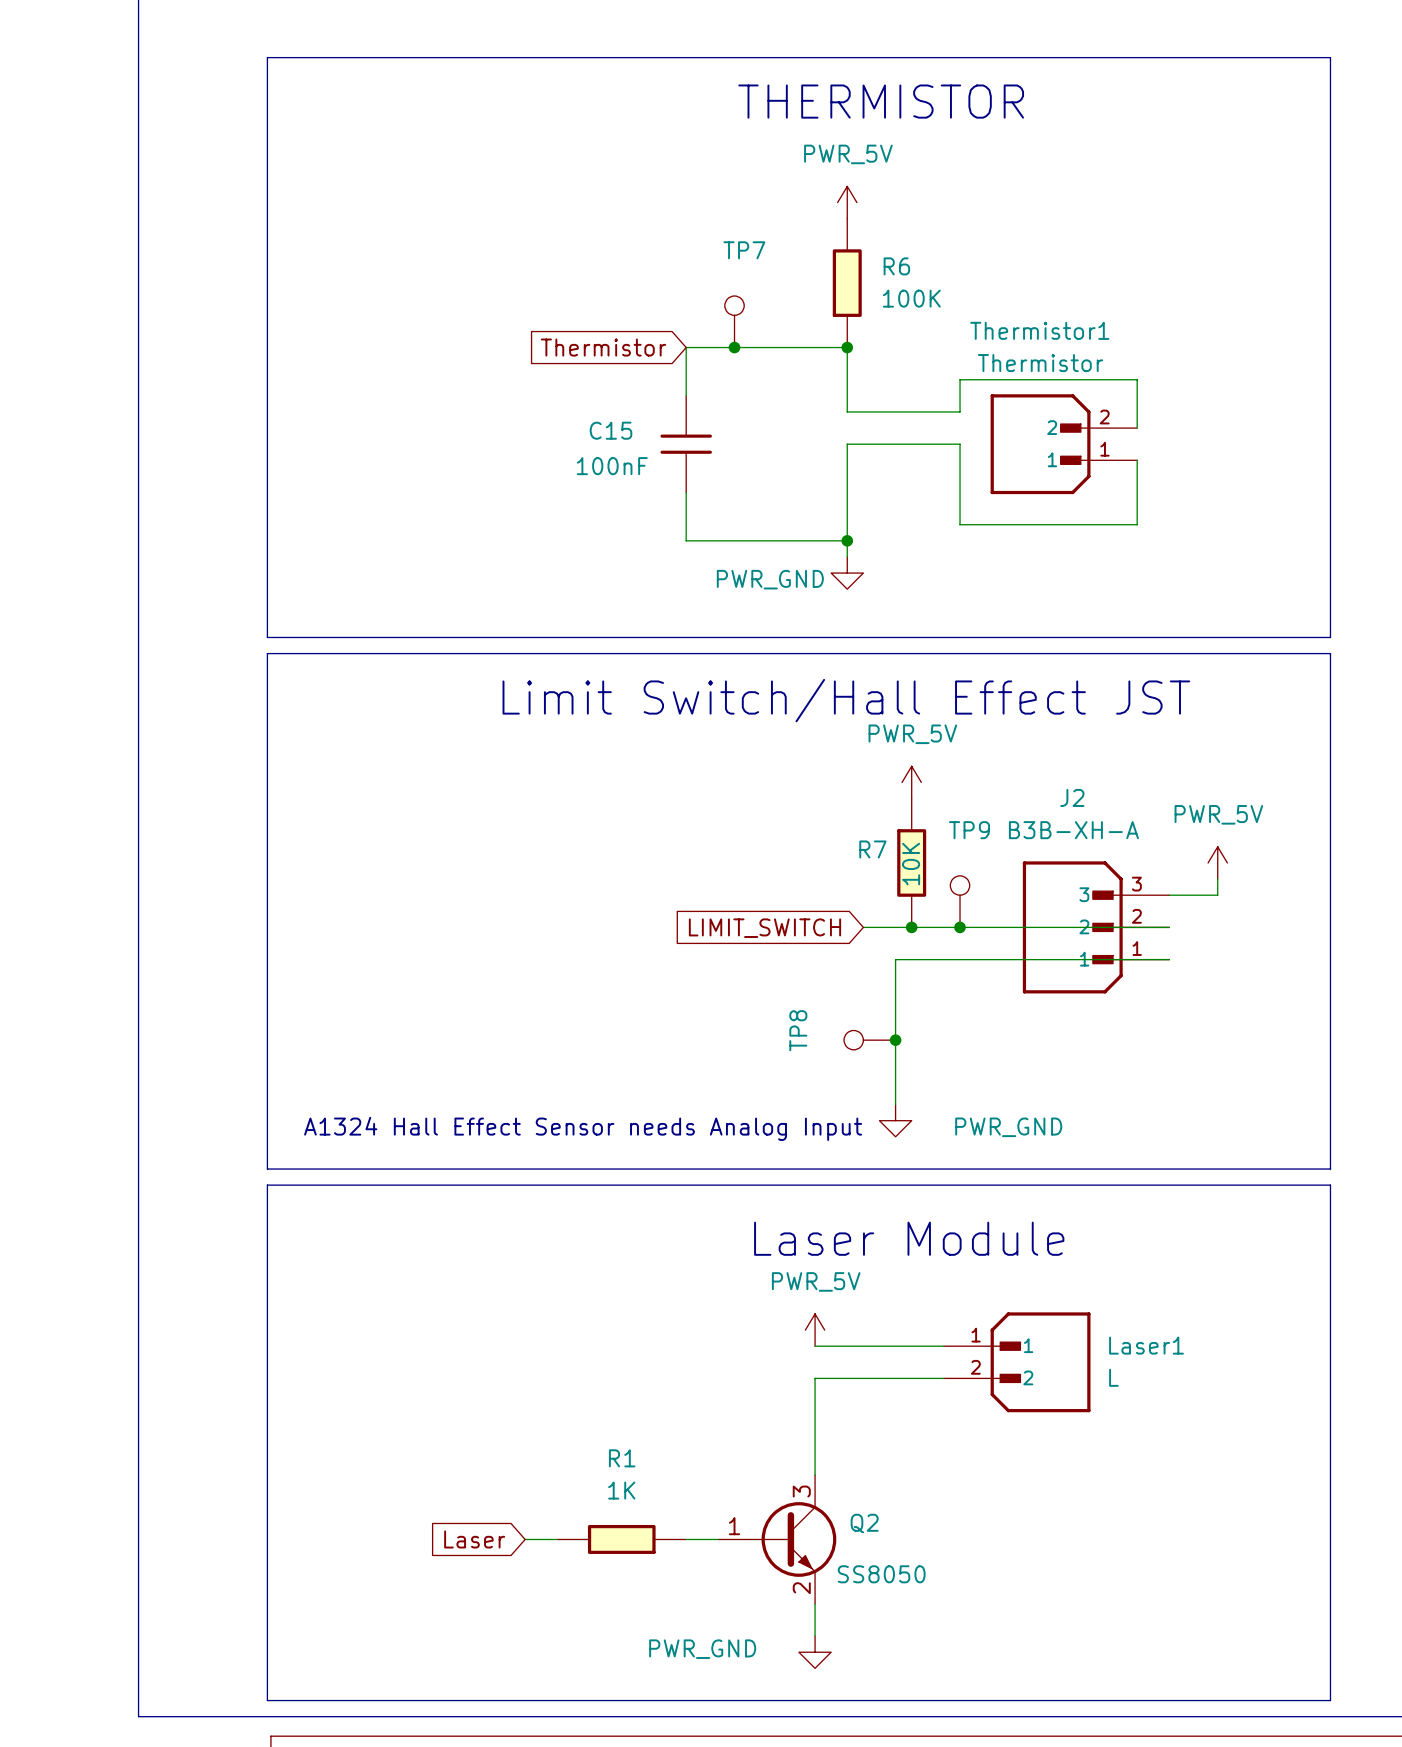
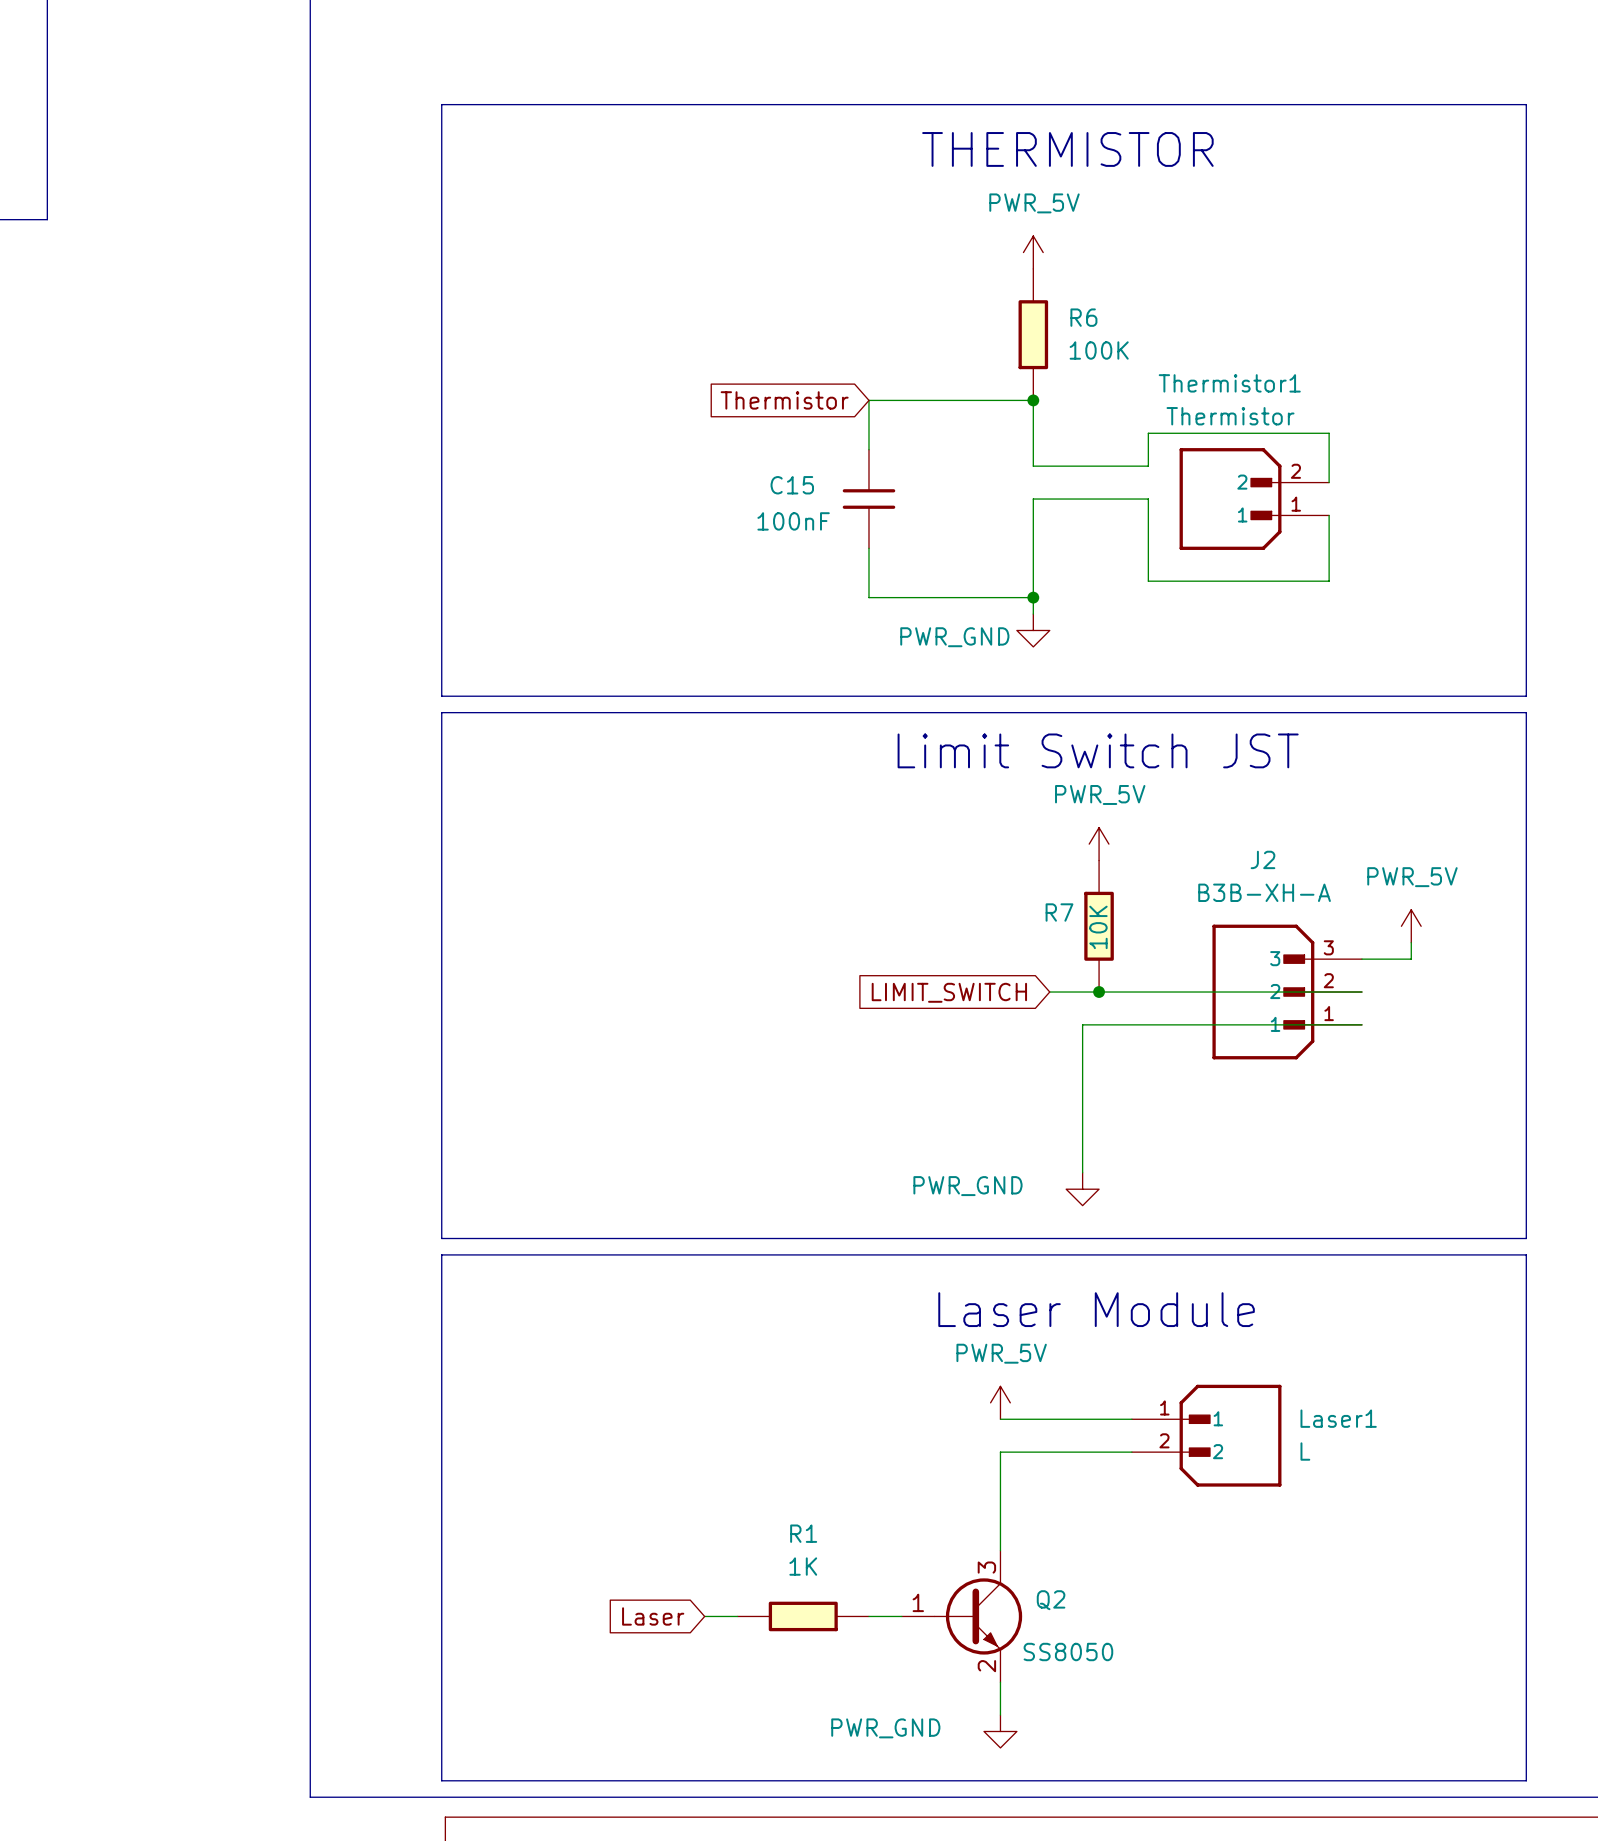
TP7: (734, 321) -> none
junction: (734, 347) -> none
text: Limit Switch/Hall Effect JST (846, 700) -> Limit Switch JST (1098, 750)
TP9: (960, 901) -> none
junction: (960, 927) -> none
TP8: (869, 1040) -> none
junction: (895, 1040) -> none
power symbol text position: PWR_GND (1008, 1127) -> PWR_GND (967, 1186)
text: A1324 Hall Effect Sensor needs Analog Input (583, 1128) -> none

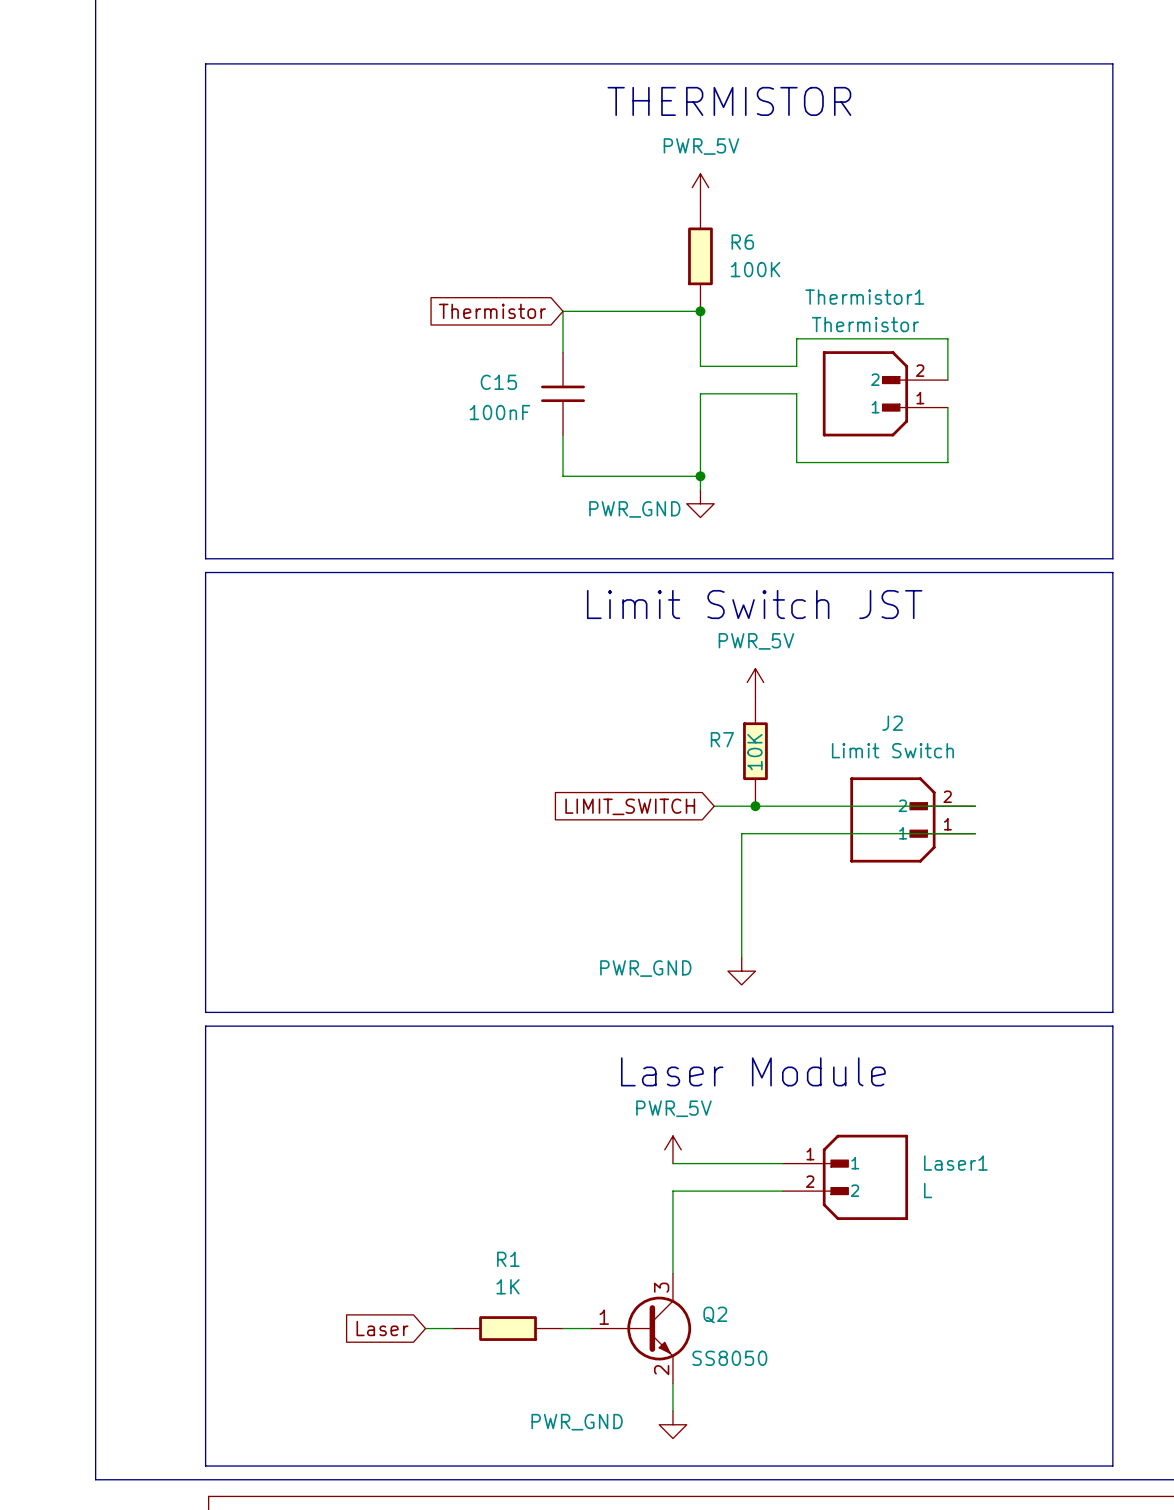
J2 value: B3B-XH-A (1264, 892) -> Limit Switch (892, 750)
J2 symbol: [1212, 924, 1362, 1060] -> [850, 777, 976, 863]
power symbol: PWR_5V (1411, 926) -> none
wire: (1411, 942) (1411, 959) (1361, 959) -> none

